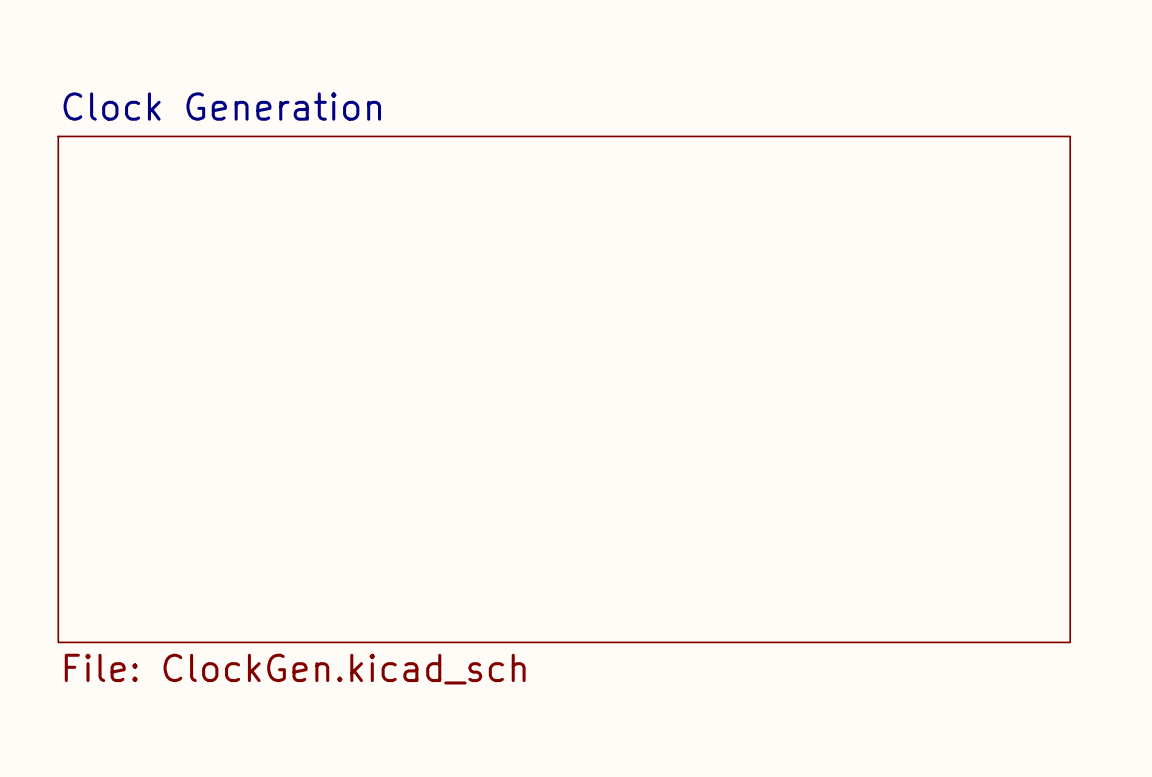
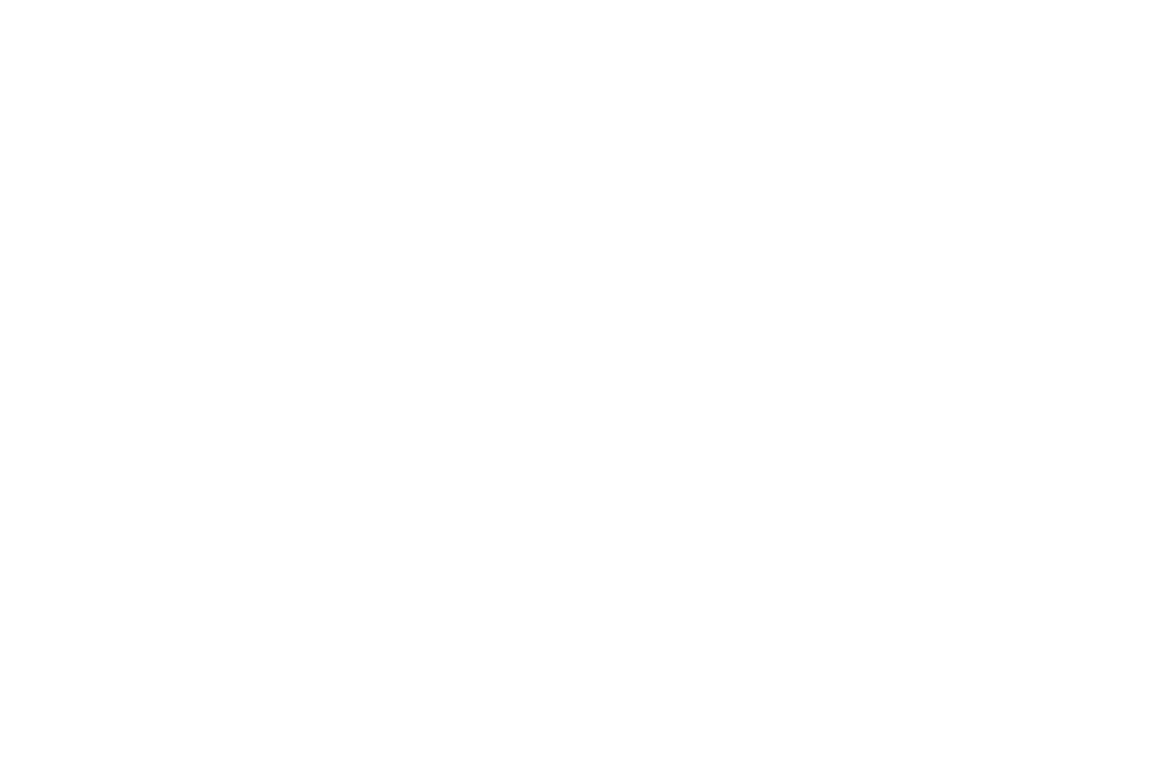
sheet Clock Generation: File: ClockGen.kicad_sch (564, 389) -> none

